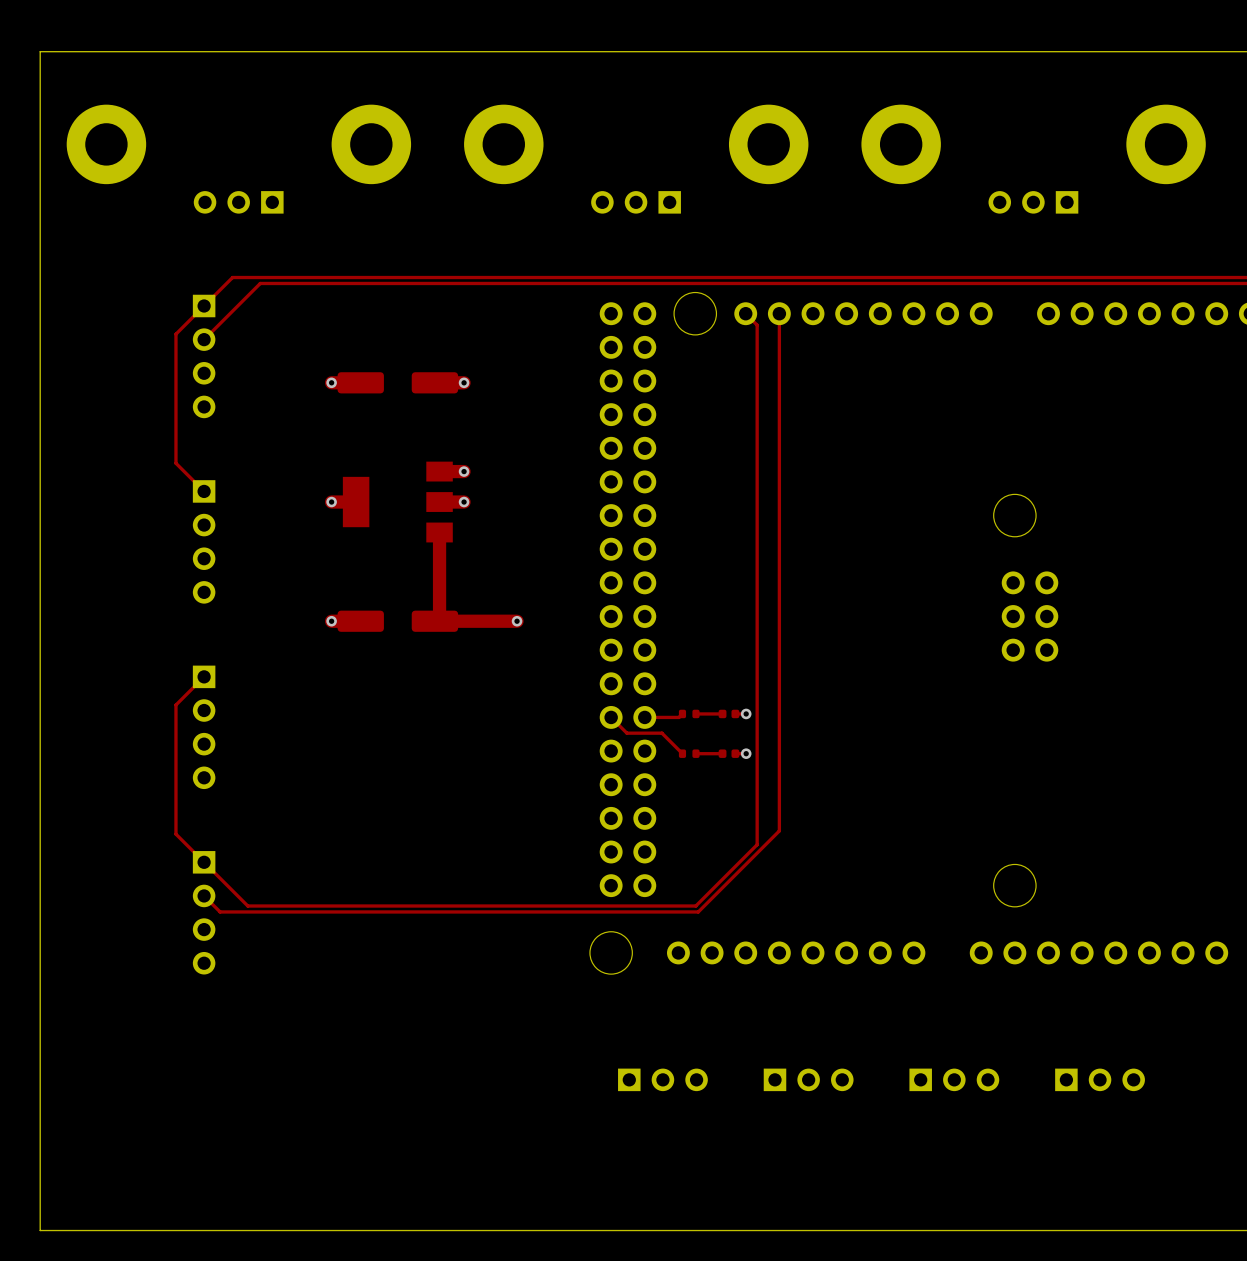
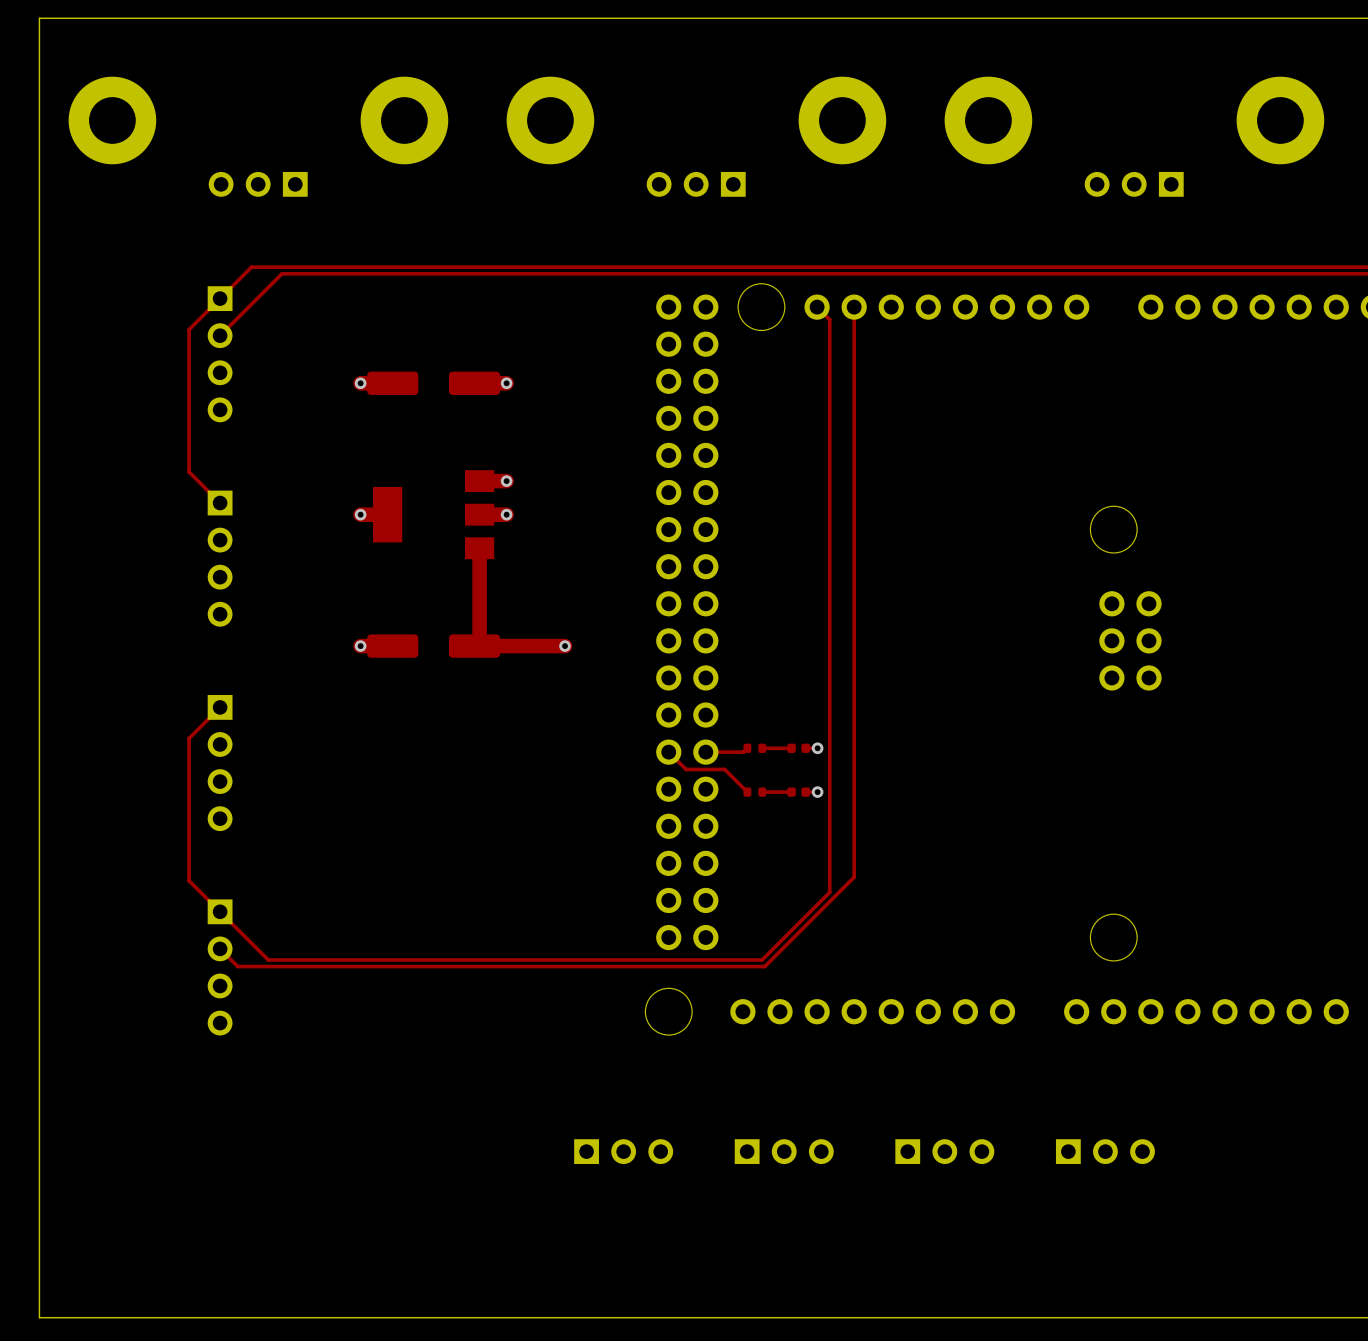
part: none -> (623, 1151)
part: (662, 1079) -> none
part: none -> (784, 1151)
part: (808, 1079) -> none
part: none -> (944, 1151)
part: (954, 1079) -> none
part: none -> (1105, 1151)
part: (1100, 1079) -> none

